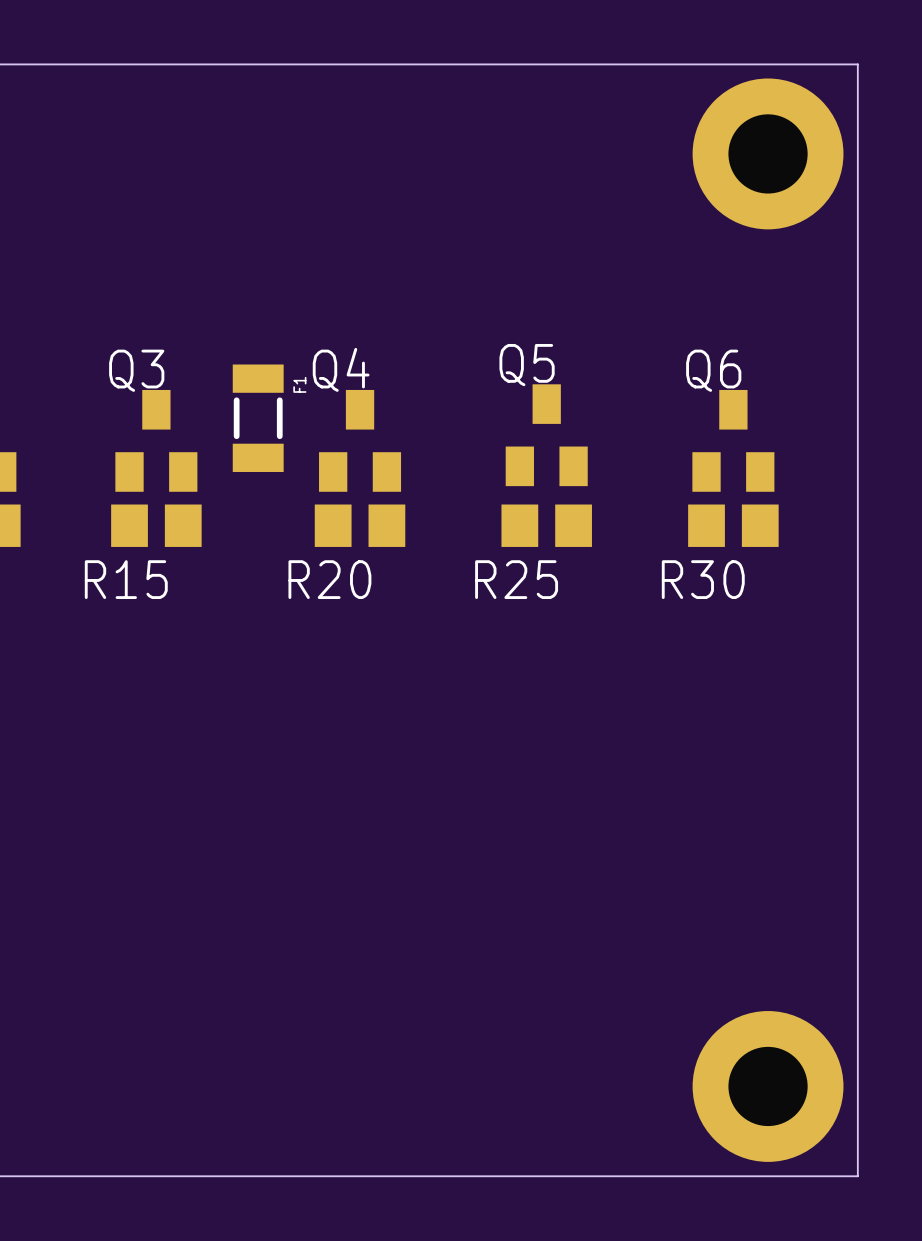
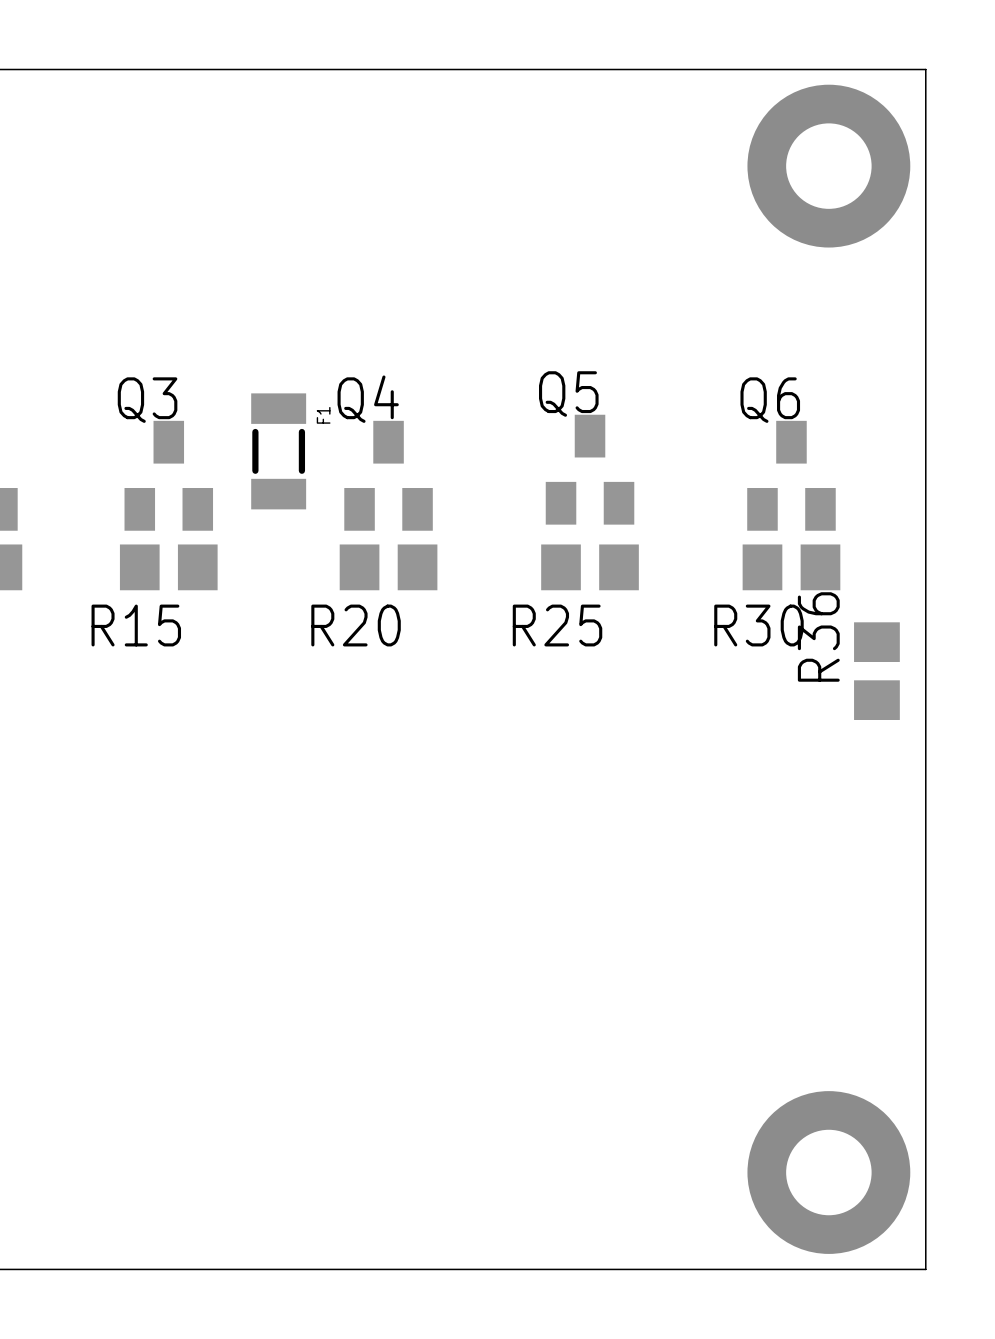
R36: none -> (876, 671)

